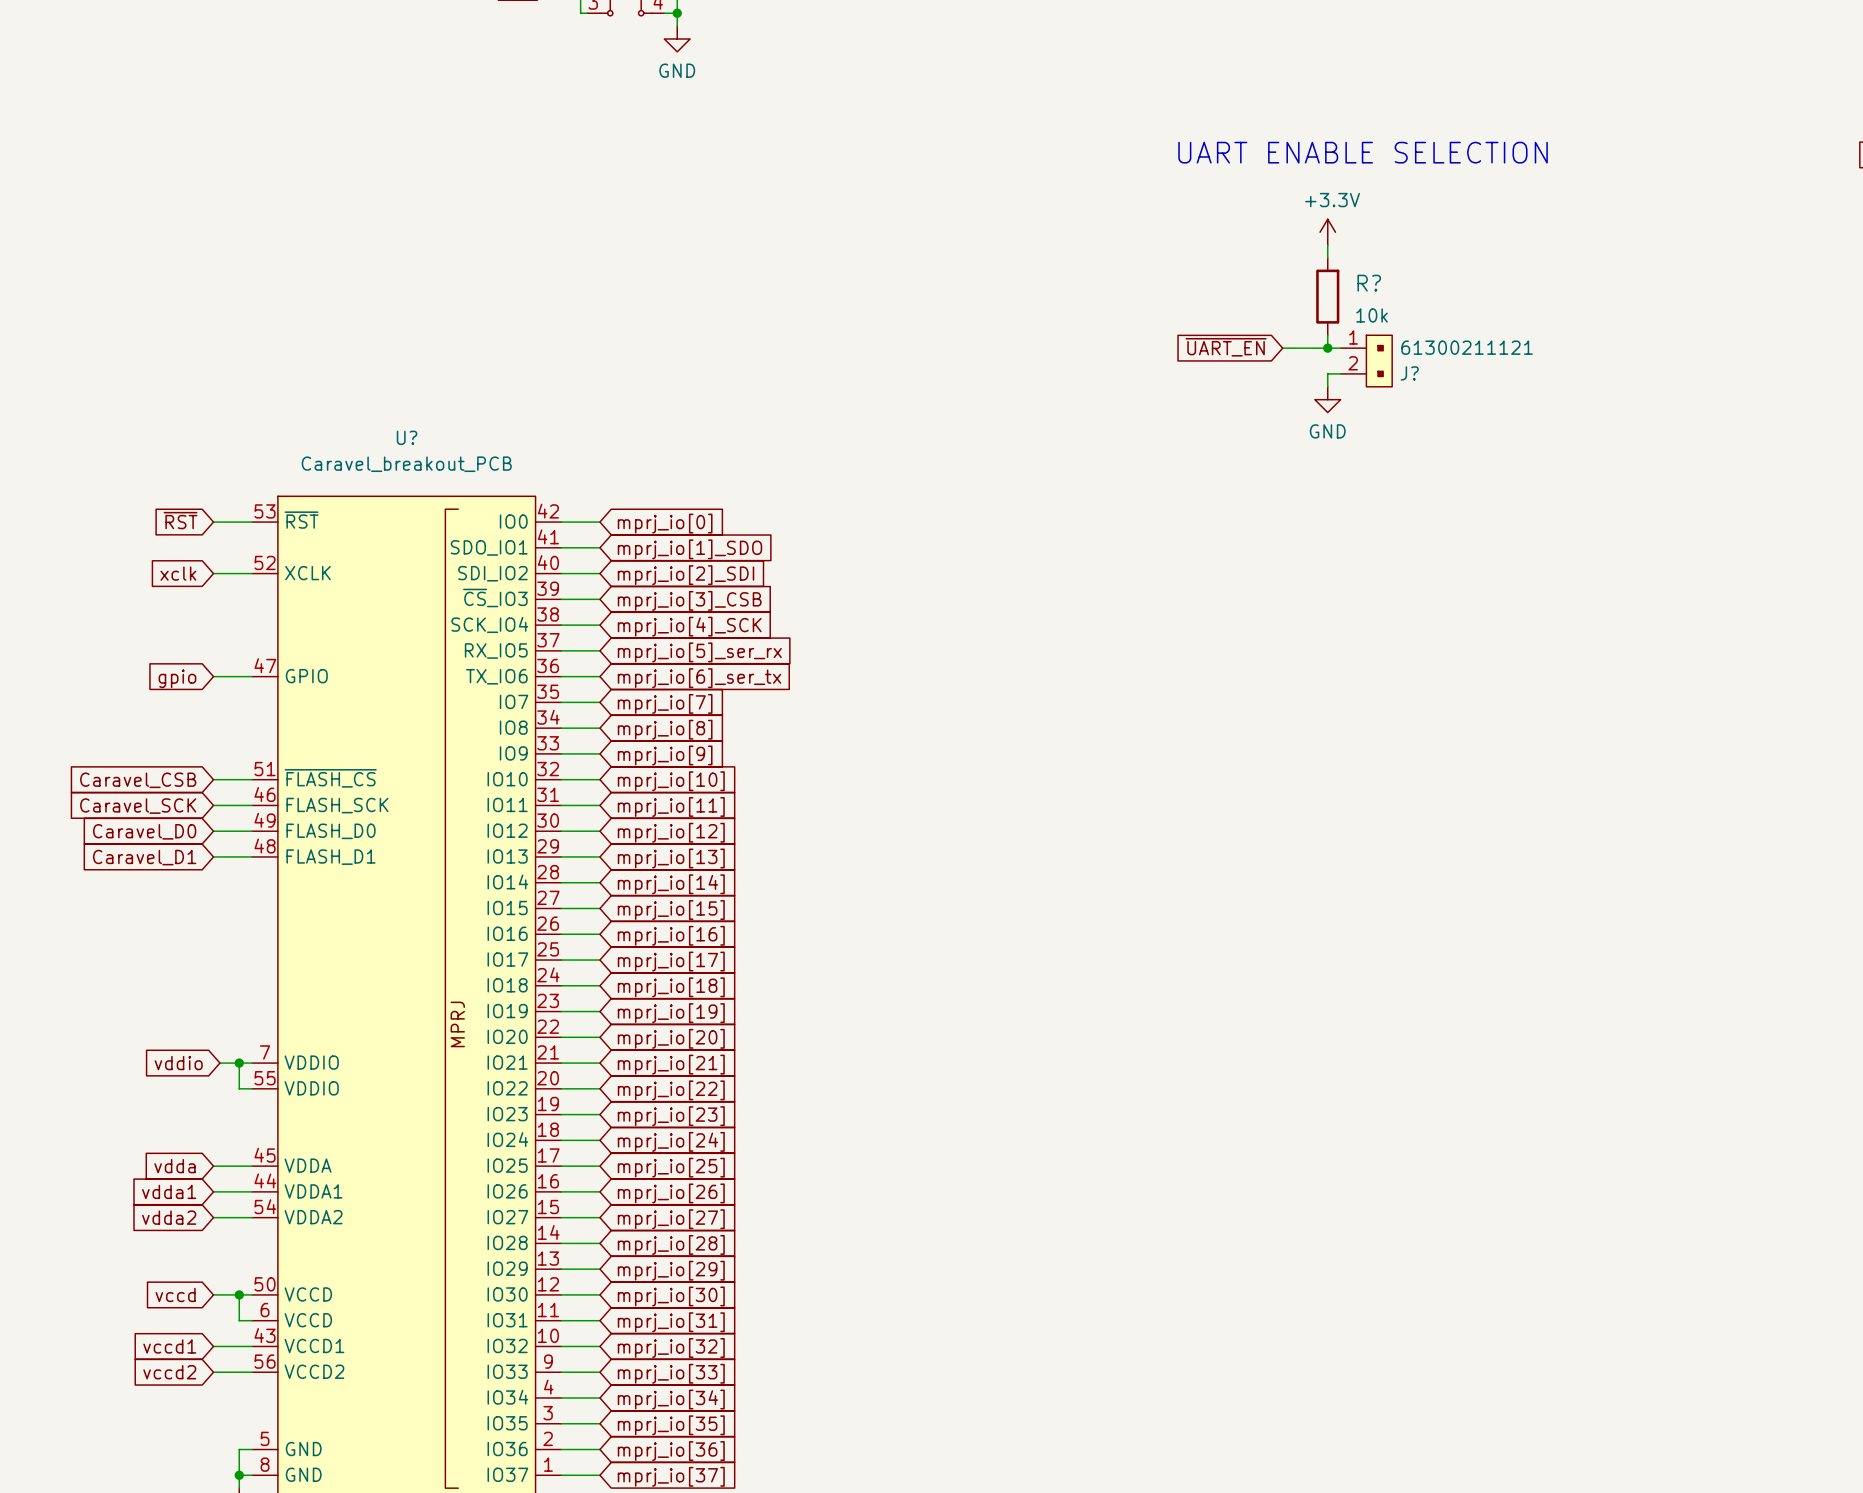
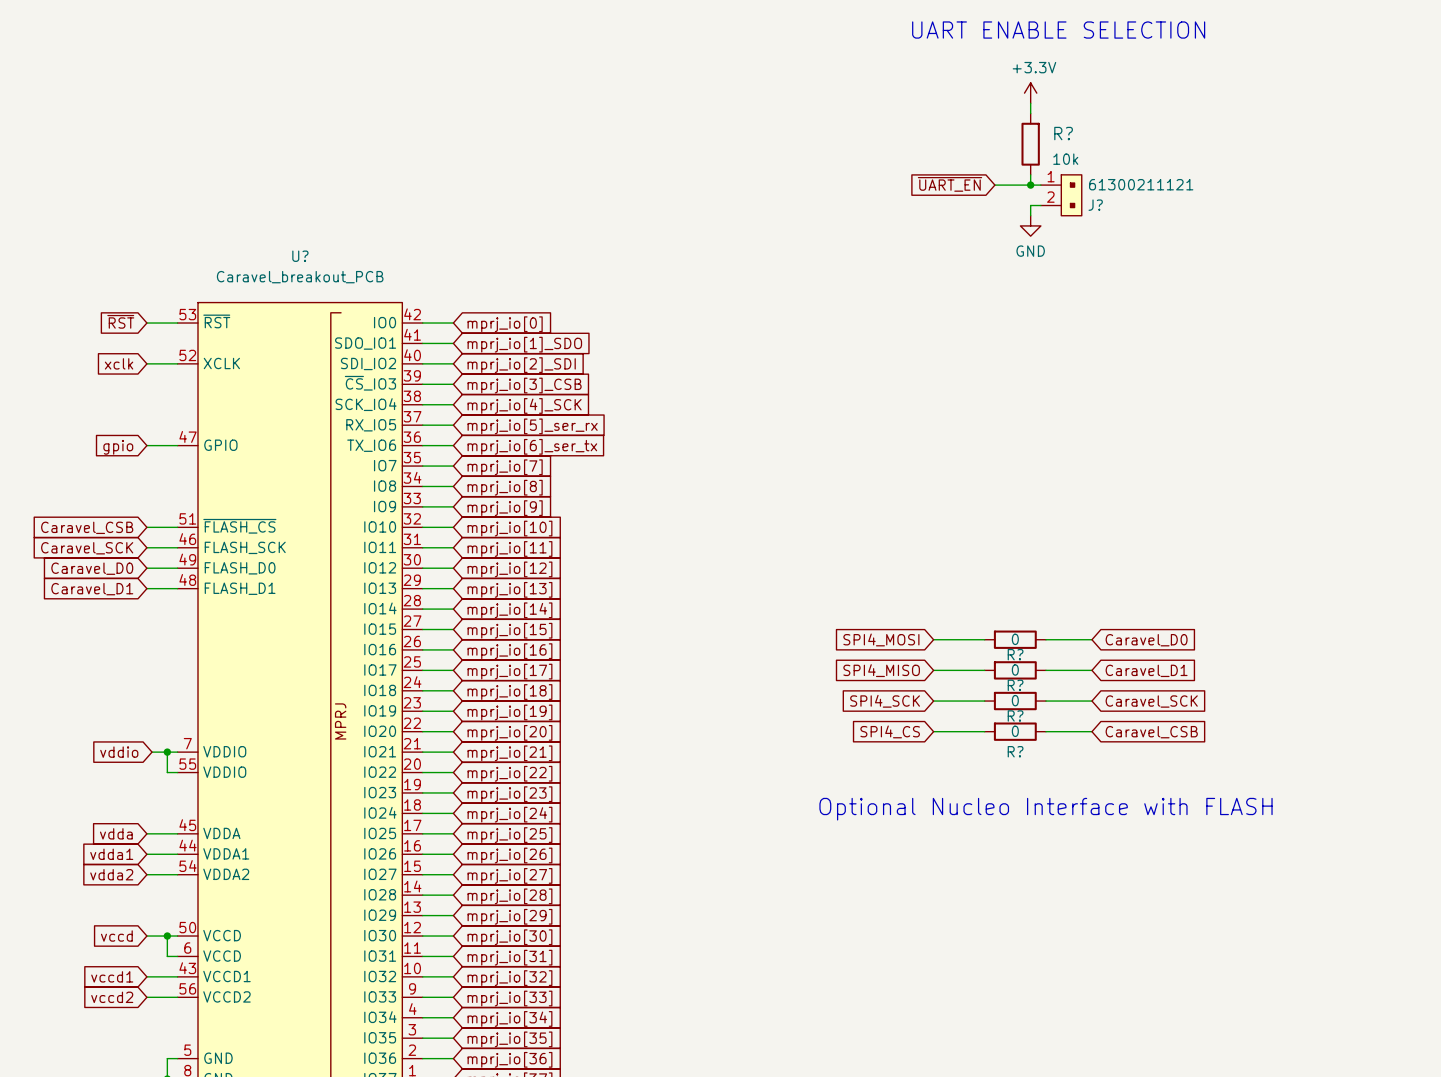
global label: none -> SPI4_MOSI (881, 639)
wire: none -> (933, 639) (984, 639)
R?: none -> 0 (1015, 639)
wire: none -> (1045, 639) (1091, 639)
global label: none -> Caravel_D0 (1146, 640)
global label: none -> SPI4_MISO (881, 670)
wire: none -> (933, 670) (984, 670)
R?: none -> 0 (1015, 670)
wire: none -> (1045, 670) (1091, 670)
global label: none -> Caravel_D1 (1146, 670)
global label: none -> SPI4_SCK (885, 701)
wire: none -> (933, 701) (984, 701)
R?: none -> 0 (1015, 701)
wire: none -> (1045, 701) (1091, 701)
global label: none -> Caravel_SCK (1151, 701)
global label: none -> SPI4_CS (890, 731)
wire: none -> (933, 731) (984, 731)
R?: none -> 0 (1015, 731)
wire: none -> (1045, 731) (1091, 731)
global label: none -> Caravel_CSB (1151, 732)
text: none -> Optional Nucleo Interface with FLASH (1046, 809)

